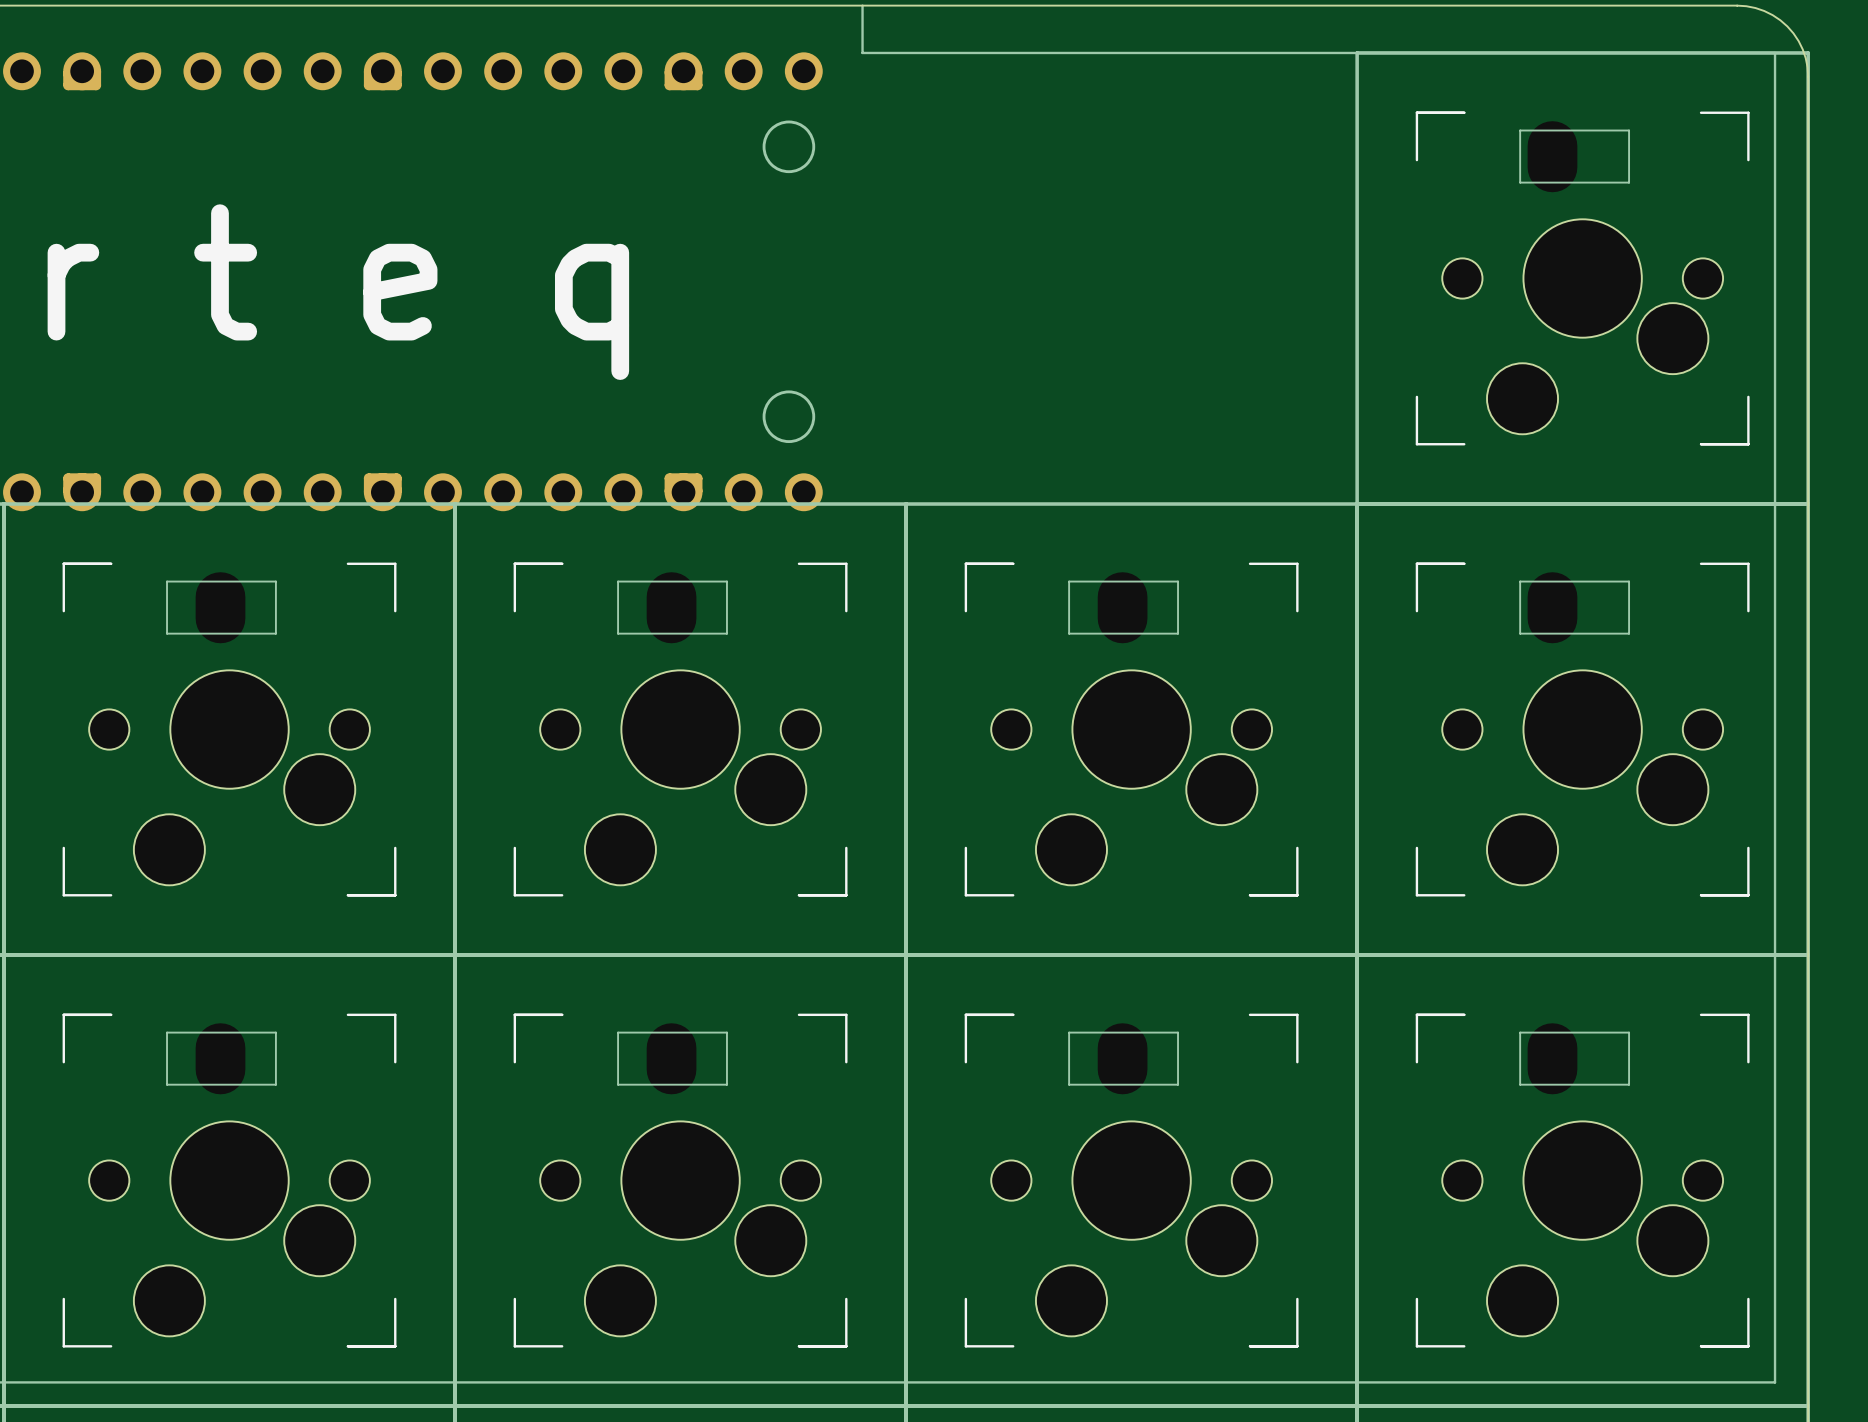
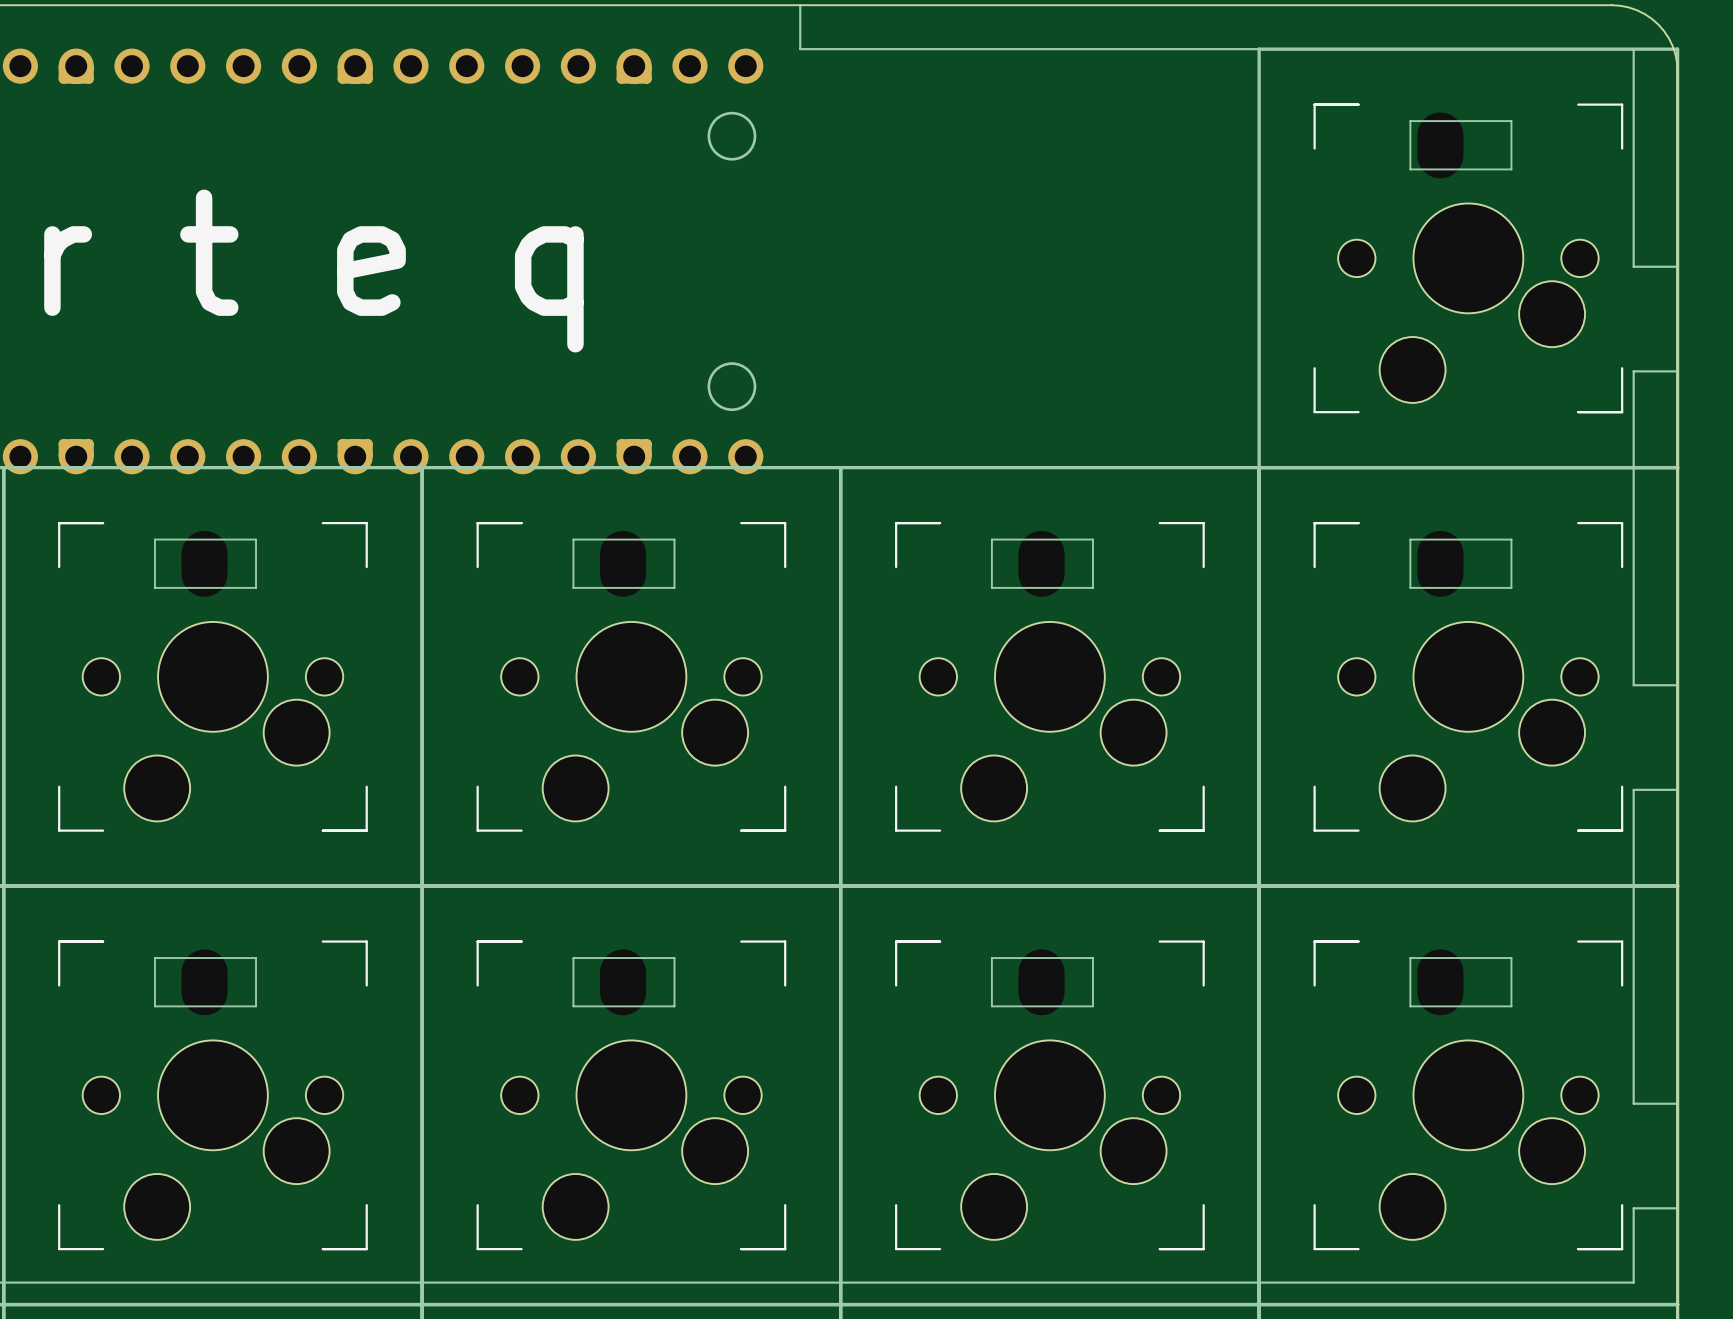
line: (1760, 52) (1775, 52) (1775, 1382) (1760, 1382) -> (1633, 49) (1633, 266) (1677, 266)
line: none -> (1677, 371) (1633, 371) (1633, 685) (1677, 685)
line: none -> (1677, 789) (1633, 789) (1633, 1103) (1677, 1103)
line: none -> (1677, 1208) (1633, 1208) (1633, 1282)

